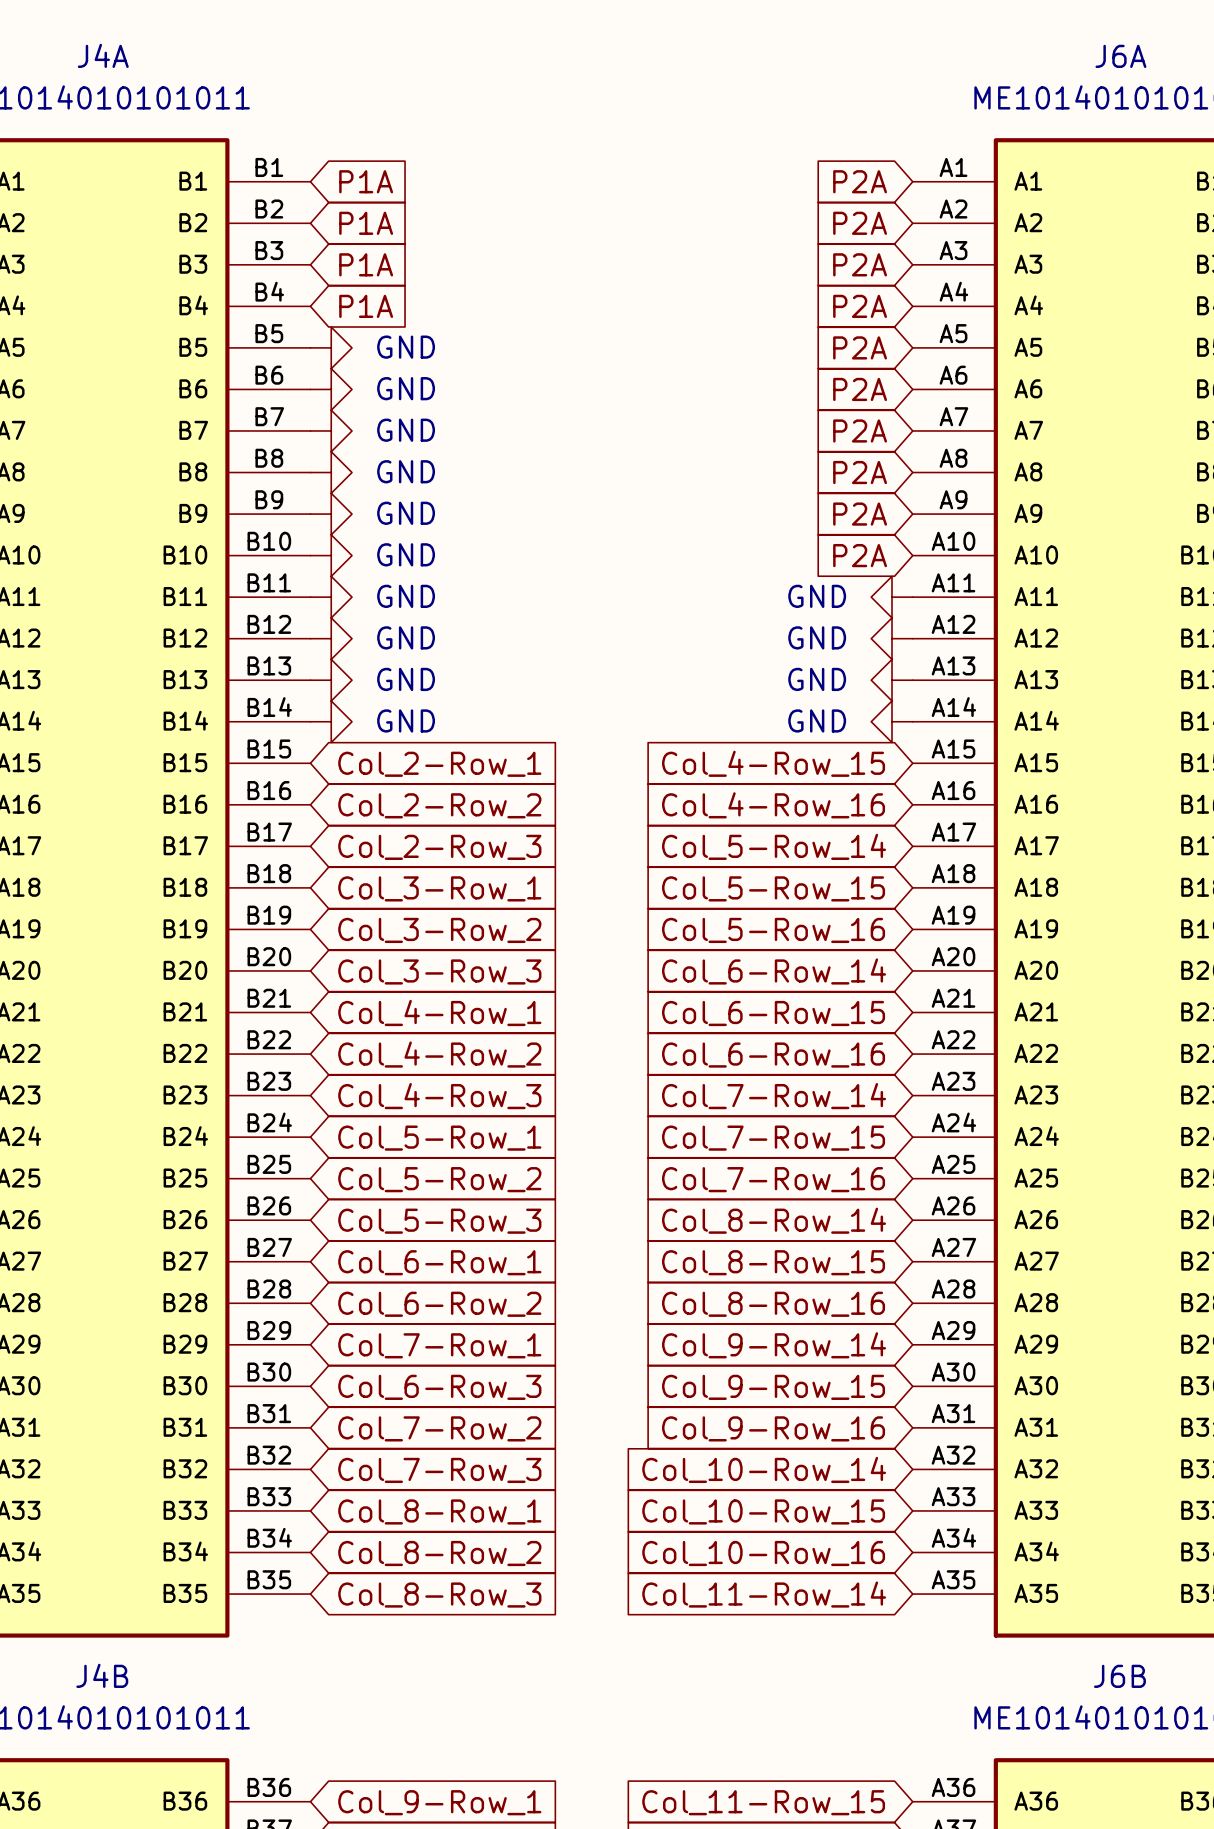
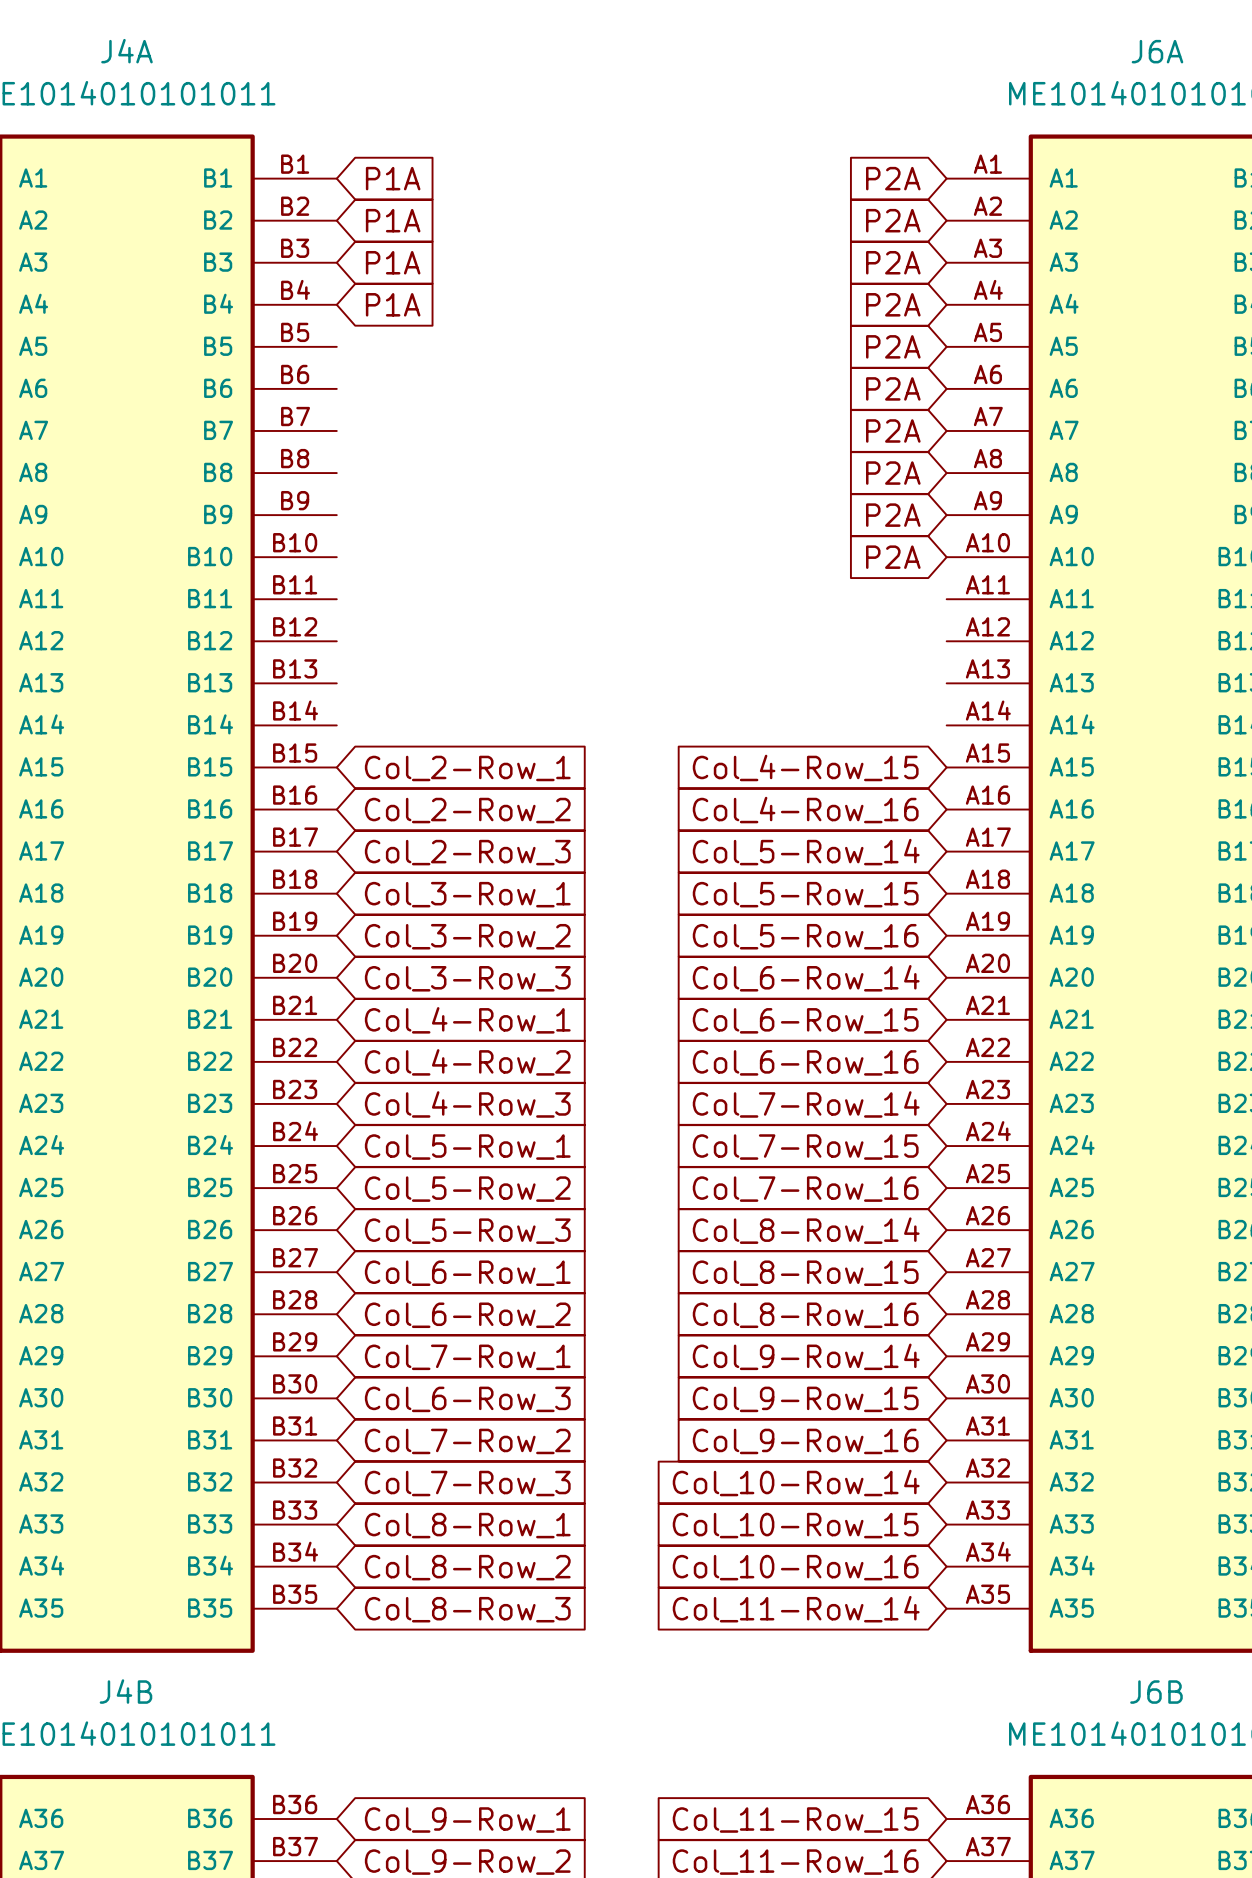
power symbol: GND (331, 347) -> none
power symbol: GND (331, 389) -> none
power symbol: GND (331, 430) -> none
power symbol: GND (331, 472) -> none
power symbol: GND (331, 514) -> none
power symbol: GND (331, 555) -> none
power symbol: GND (331, 597) -> none
power symbol: GND (892, 597) -> none
power symbol: GND (331, 638) -> none
power symbol: GND (892, 638) -> none
power symbol: GND (331, 680) -> none
power symbol: GND (892, 680) -> none
power symbol: GND (331, 721) -> none
power symbol: GND (892, 721) -> none

